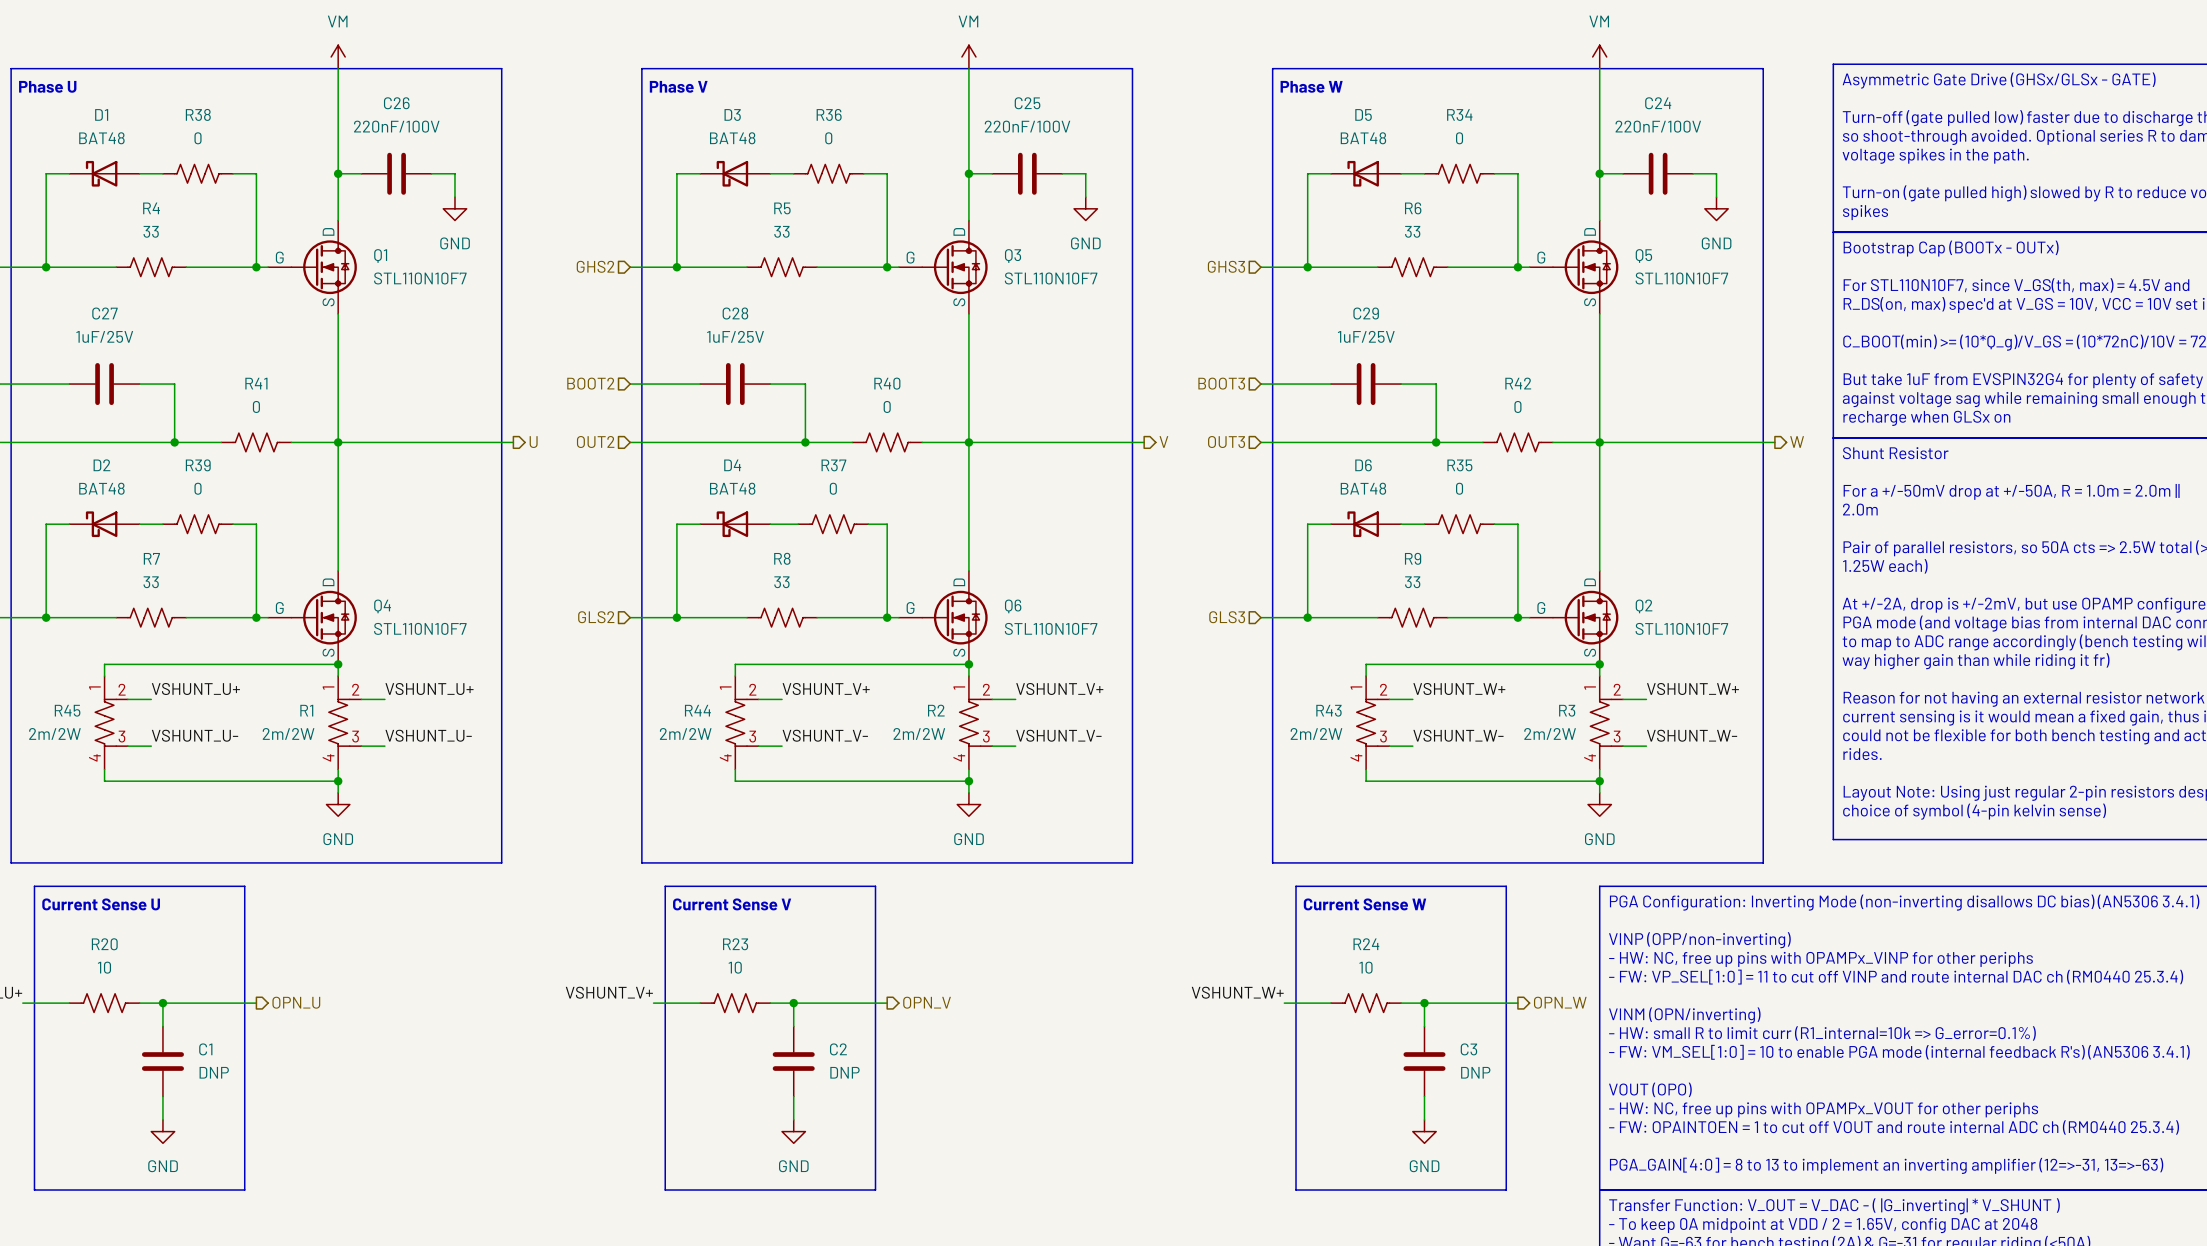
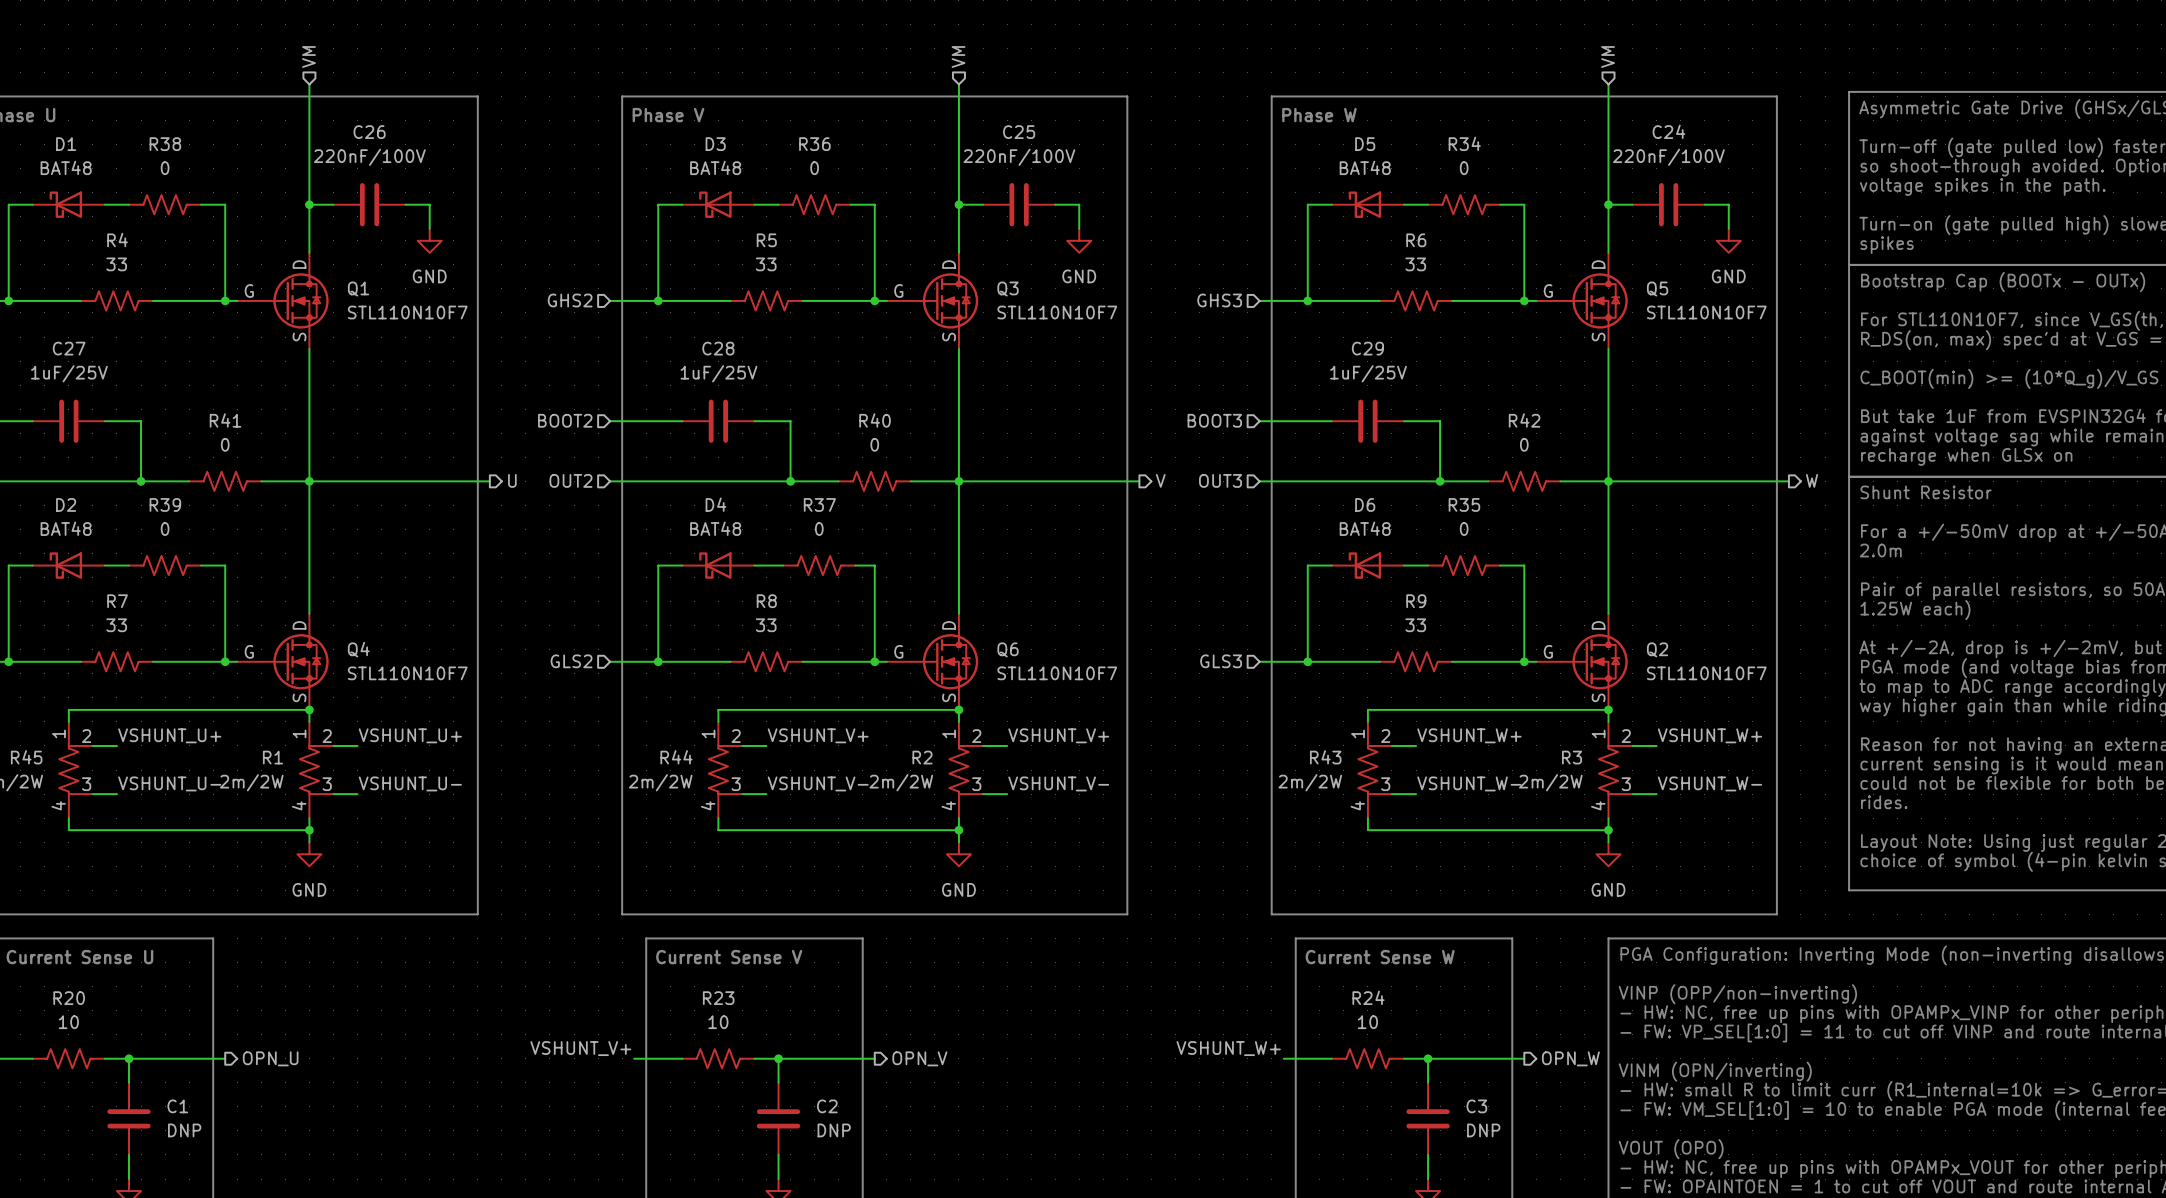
hierarchical label: none -> VM (308, 57)
hierarchical label: none -> VM (958, 57)
hierarchical label: none -> VM (1608, 57)
power symbol: VM (338, 56) -> none
power symbol: VM (968, 56) -> none
power symbol: VM (1599, 56) -> none

